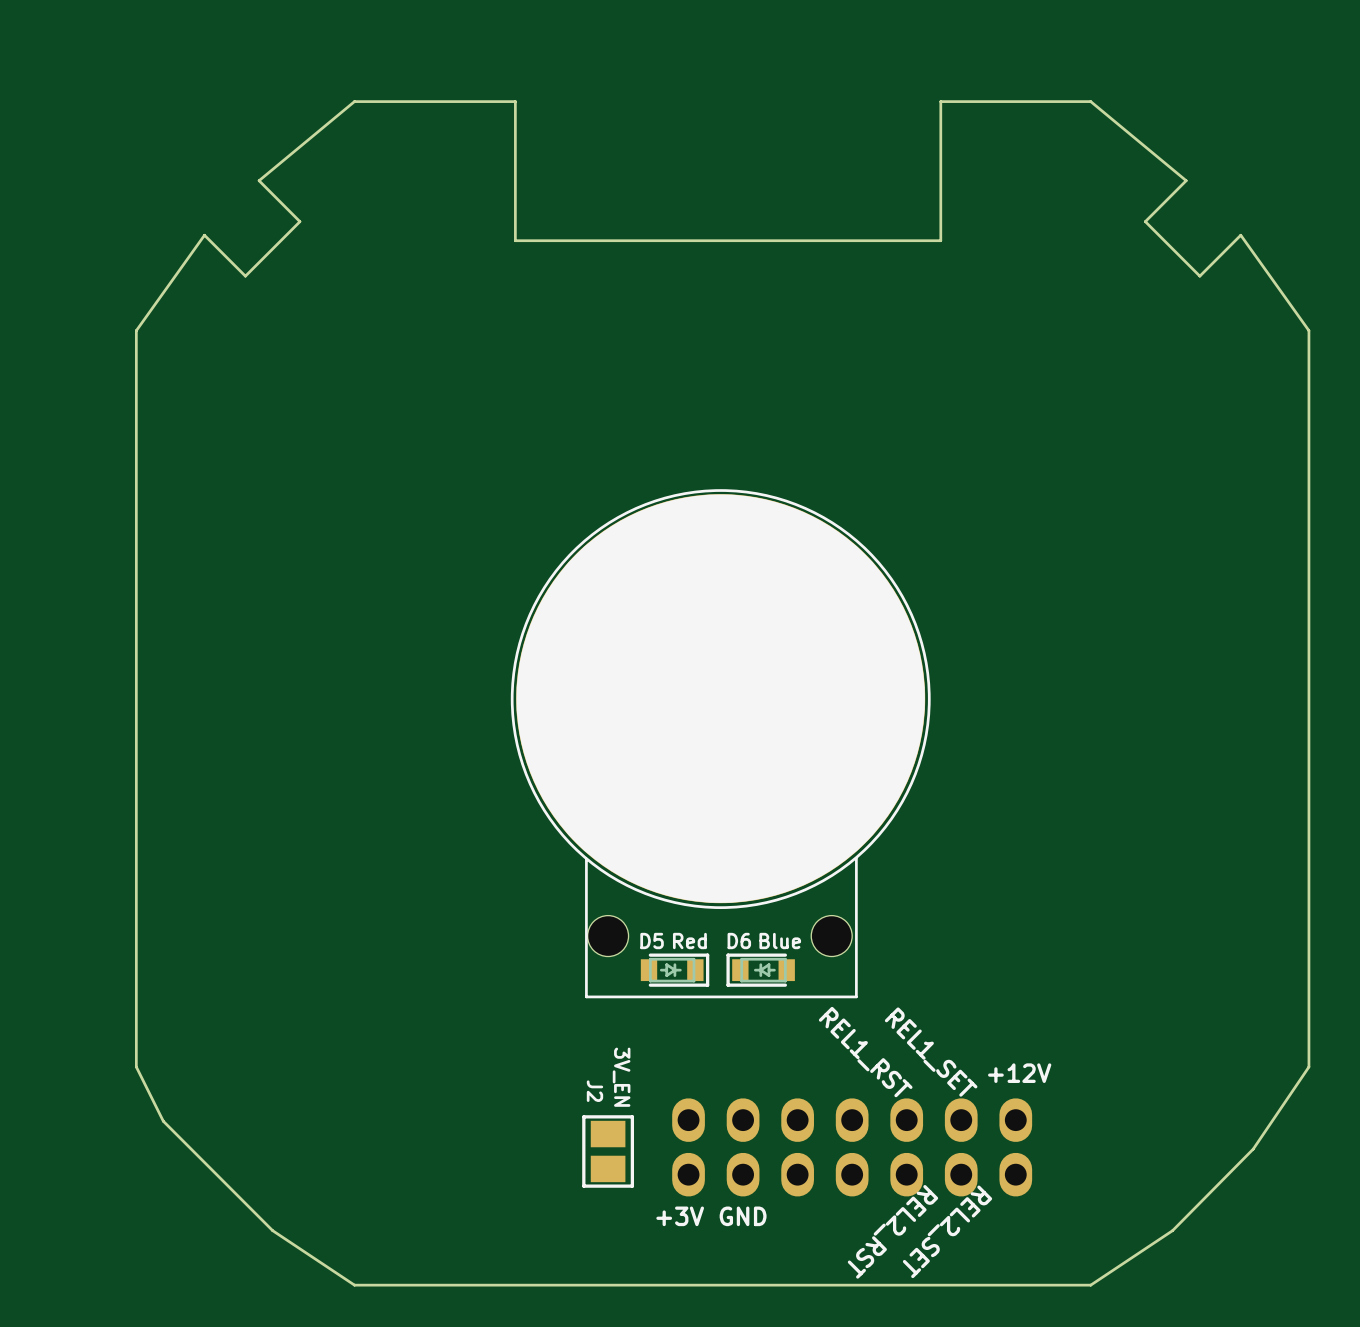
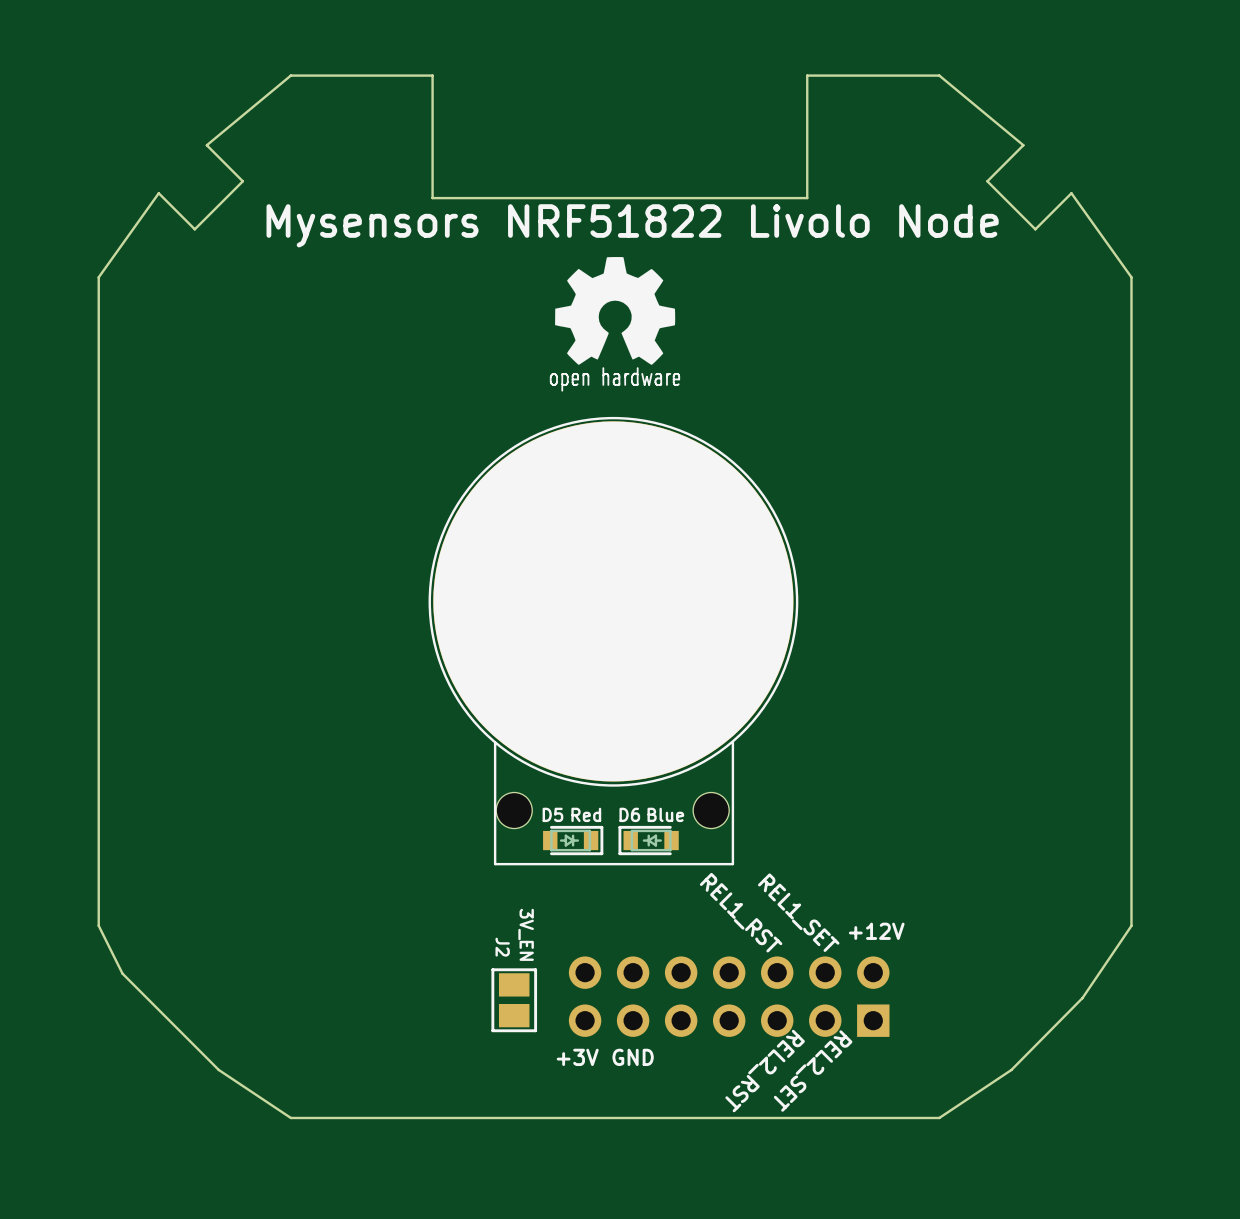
text: none -> Mysensors NRF51822 Livolo Node (632, 225)
drawing: none -> [549, 257, 681, 392]
part footprint: [672, 1098, 1033, 1197] -> [568, 956, 890, 1037]

